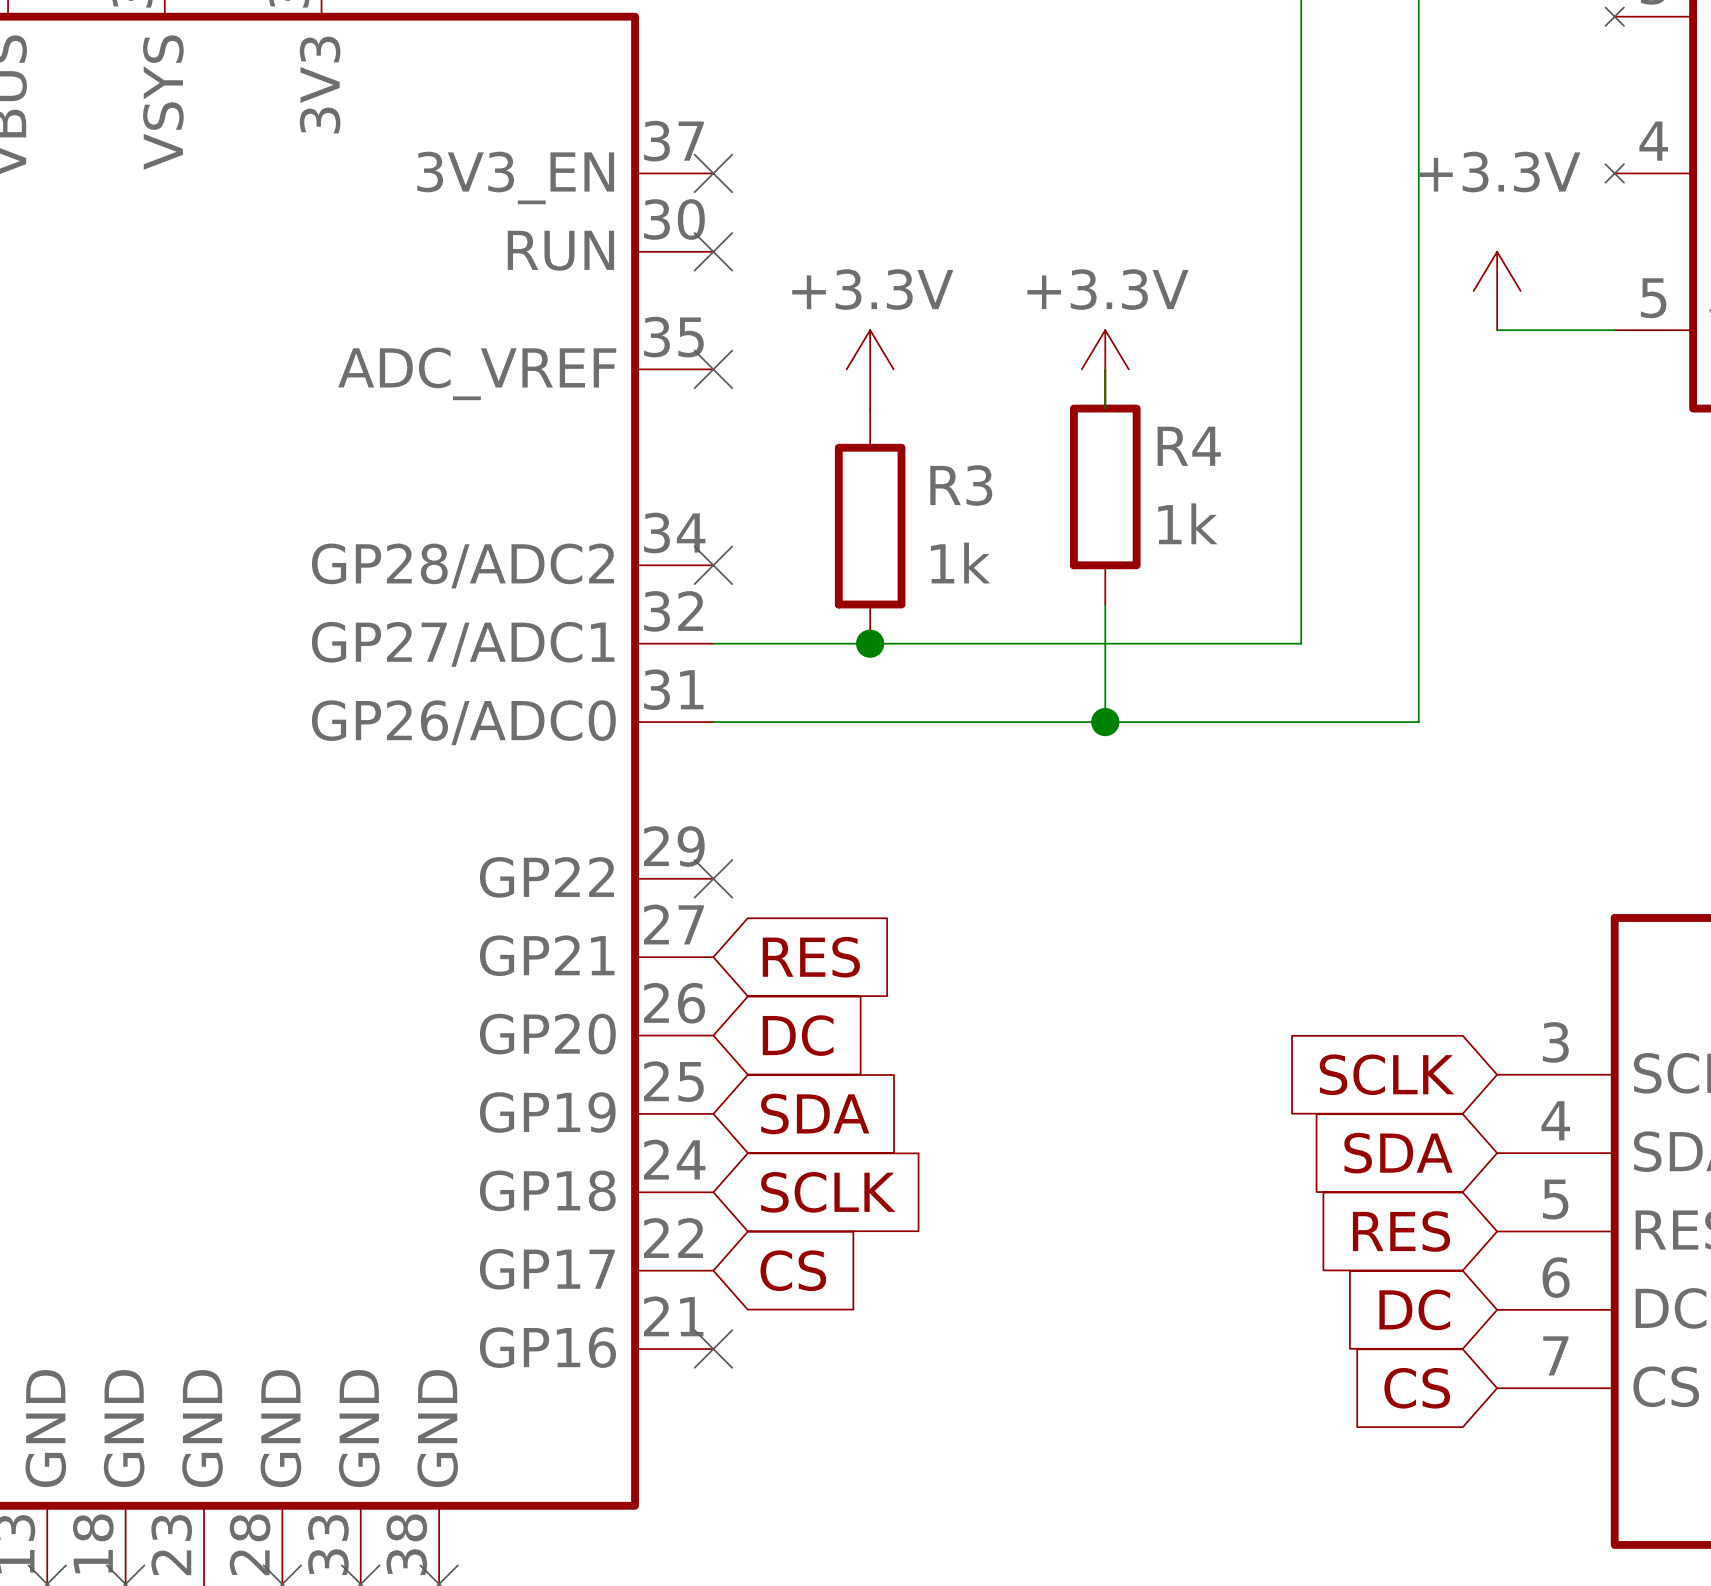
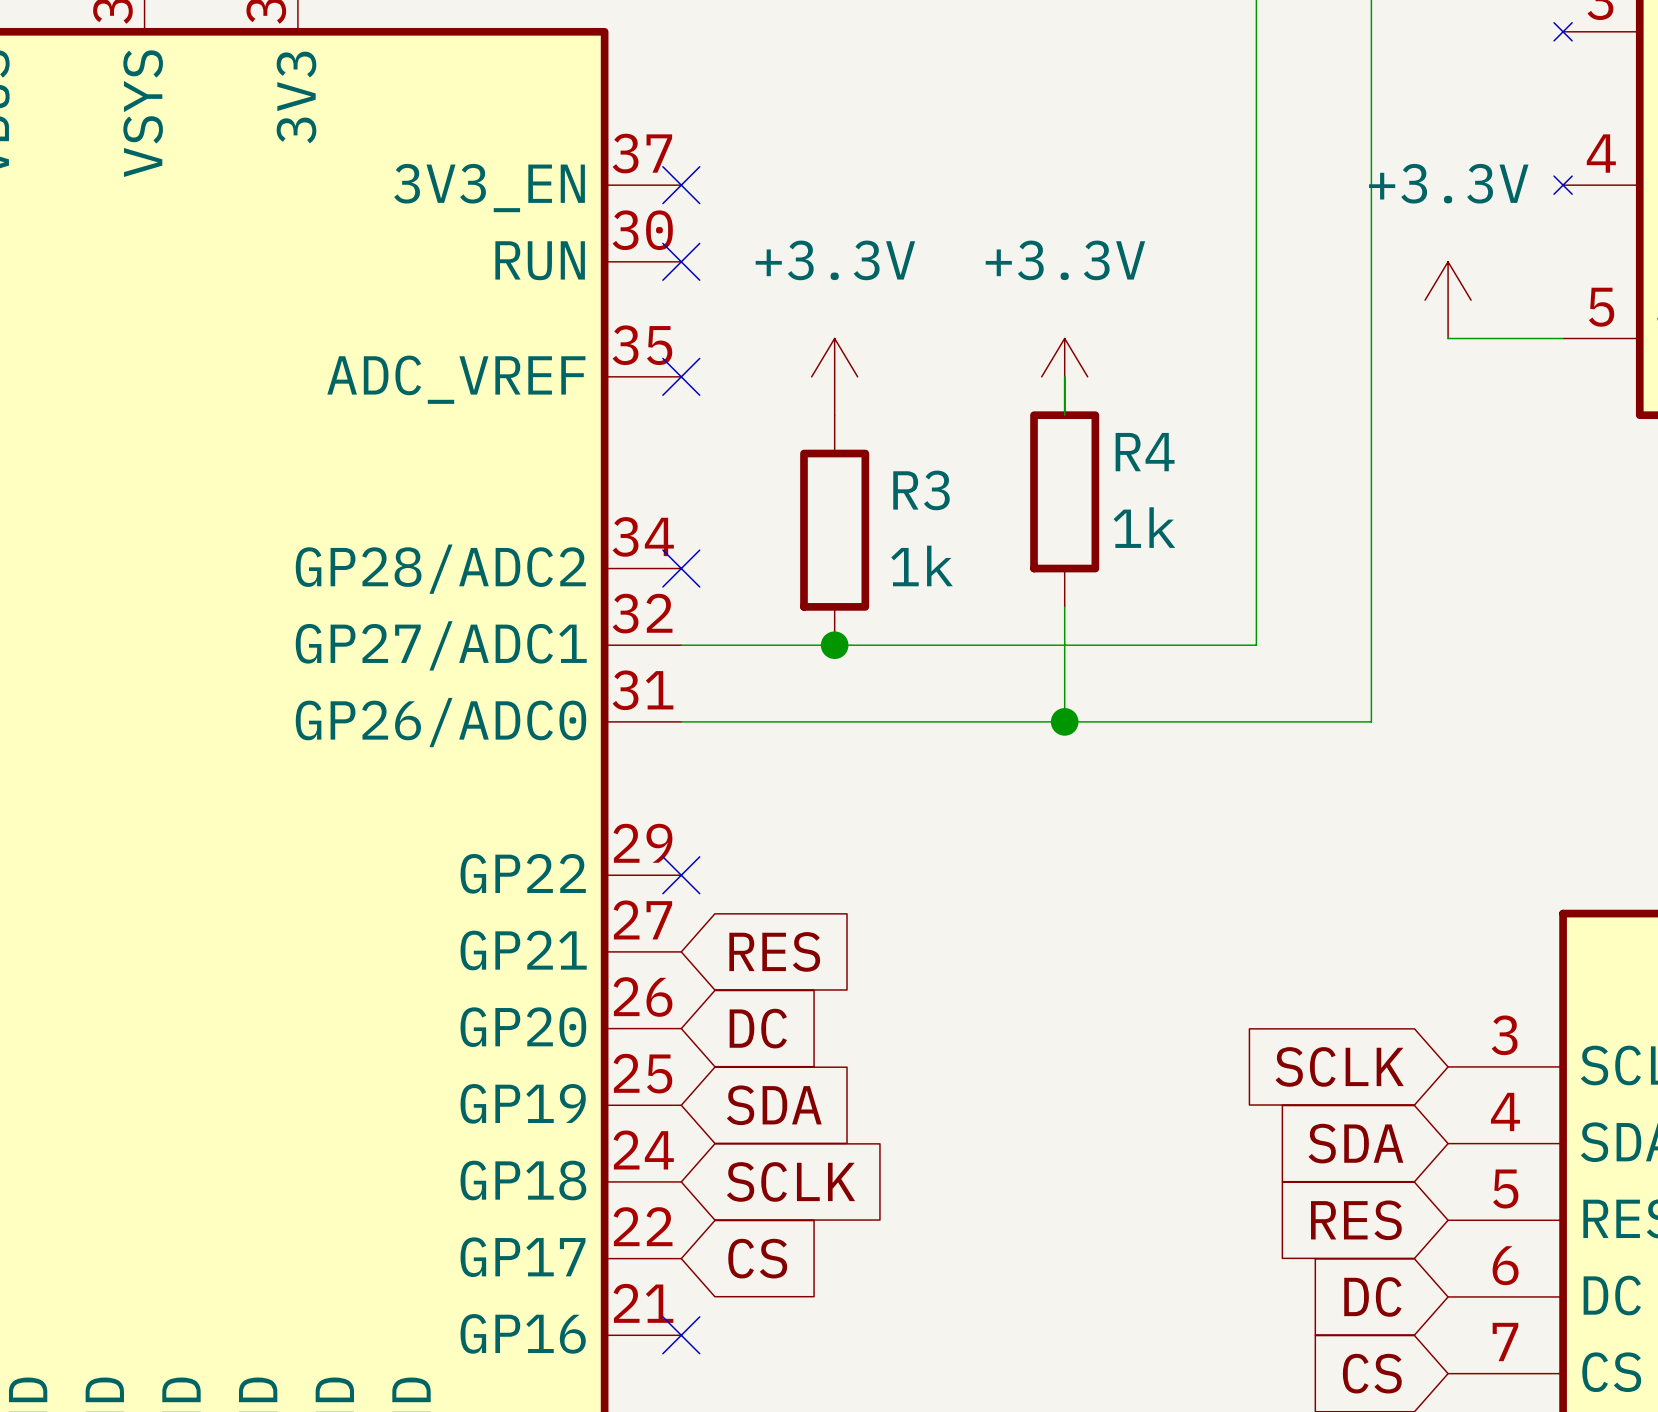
power symbol text position: +3.3V (872, 289) -> +3.3V (835, 260)
power symbol text position: +3.3V (1107, 289) -> +3.3V (1065, 260)

